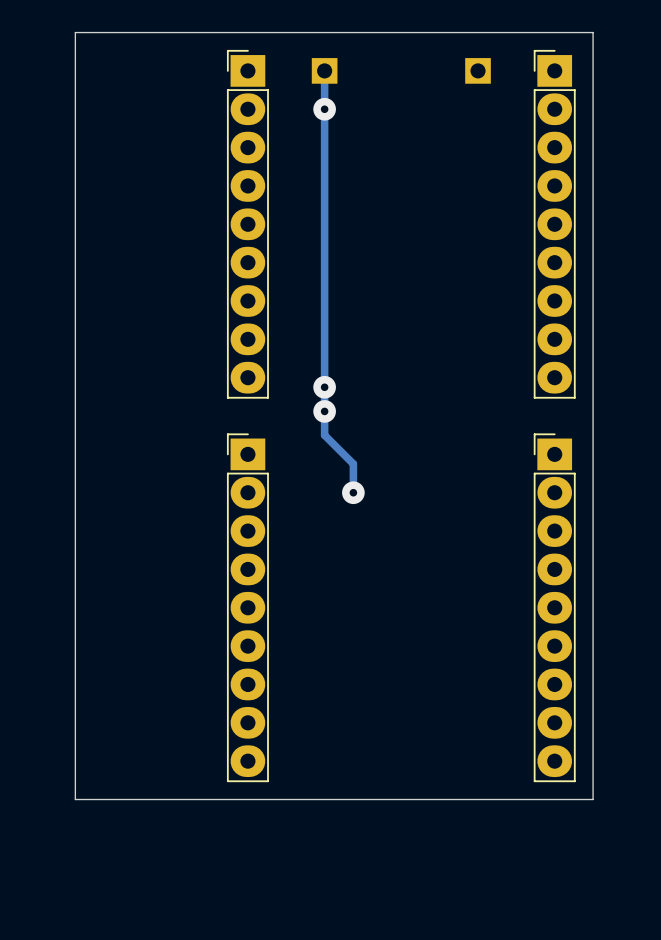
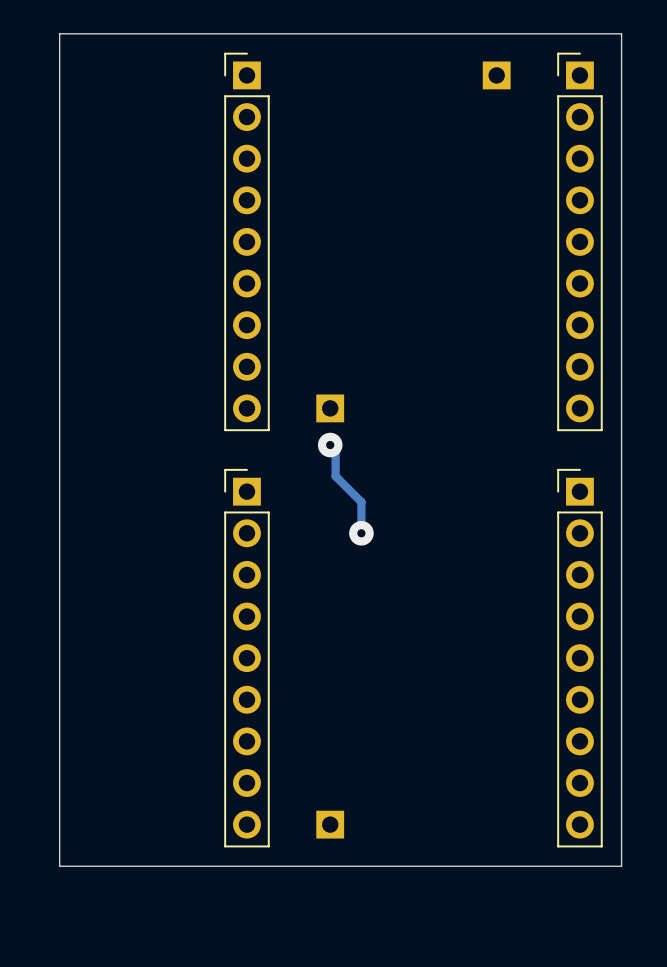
part footprint: [226, 49, 269, 399] -> [224, 52, 270, 432]
part footprint: [533, 49, 576, 399] -> [557, 52, 603, 432]
track: (324, 70) (324, 435) (329, 440) -> (335, 445) (335, 476)
part position: (324, 70) -> (330, 408)
via: (324, 109) -> none
via: (324, 387) -> none
part footprint: [226, 433, 269, 783] -> [224, 468, 270, 848]
part footprint: [533, 433, 576, 783] -> [557, 468, 603, 848]
part: none -> (330, 824)

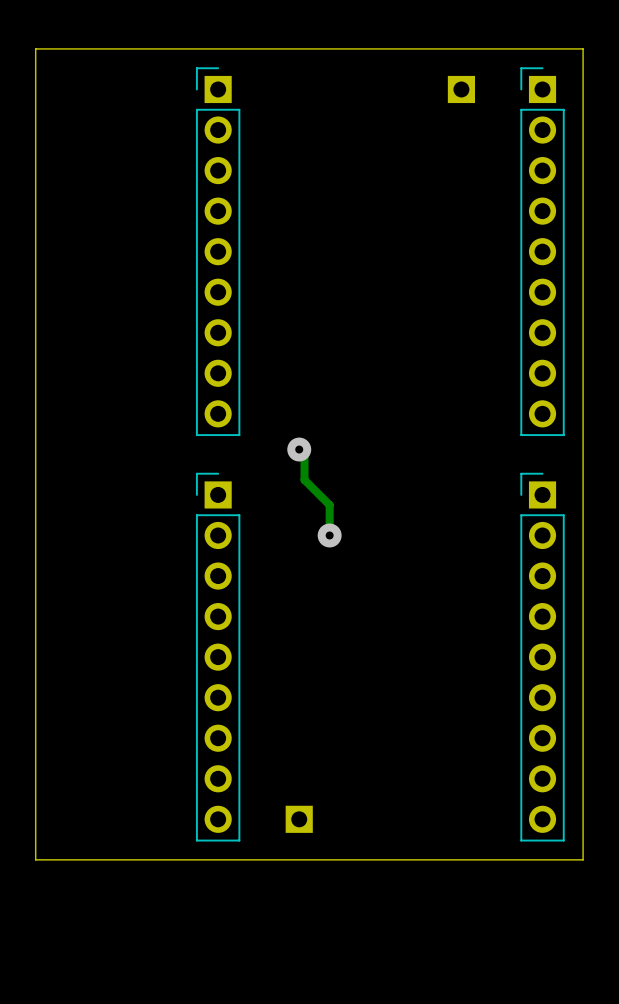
part: (330, 408) -> none

